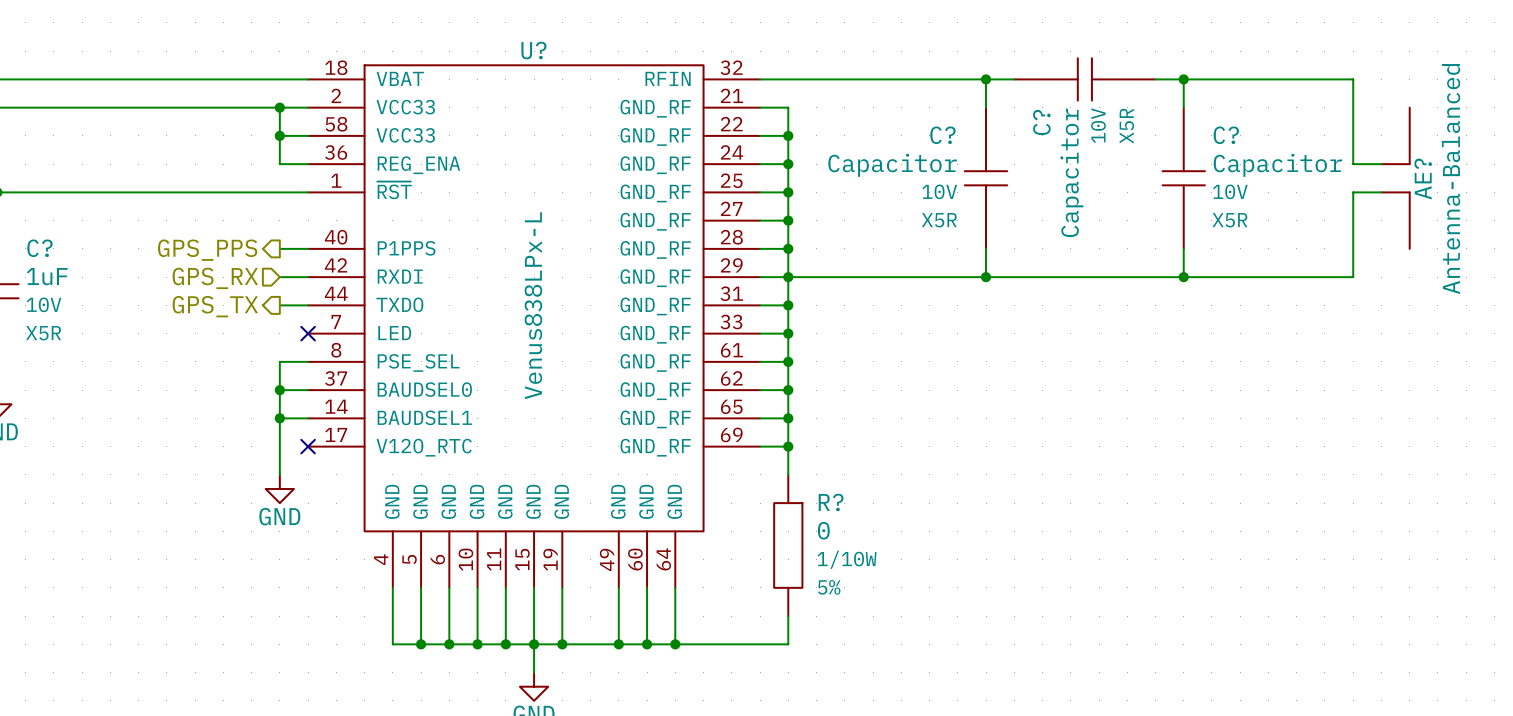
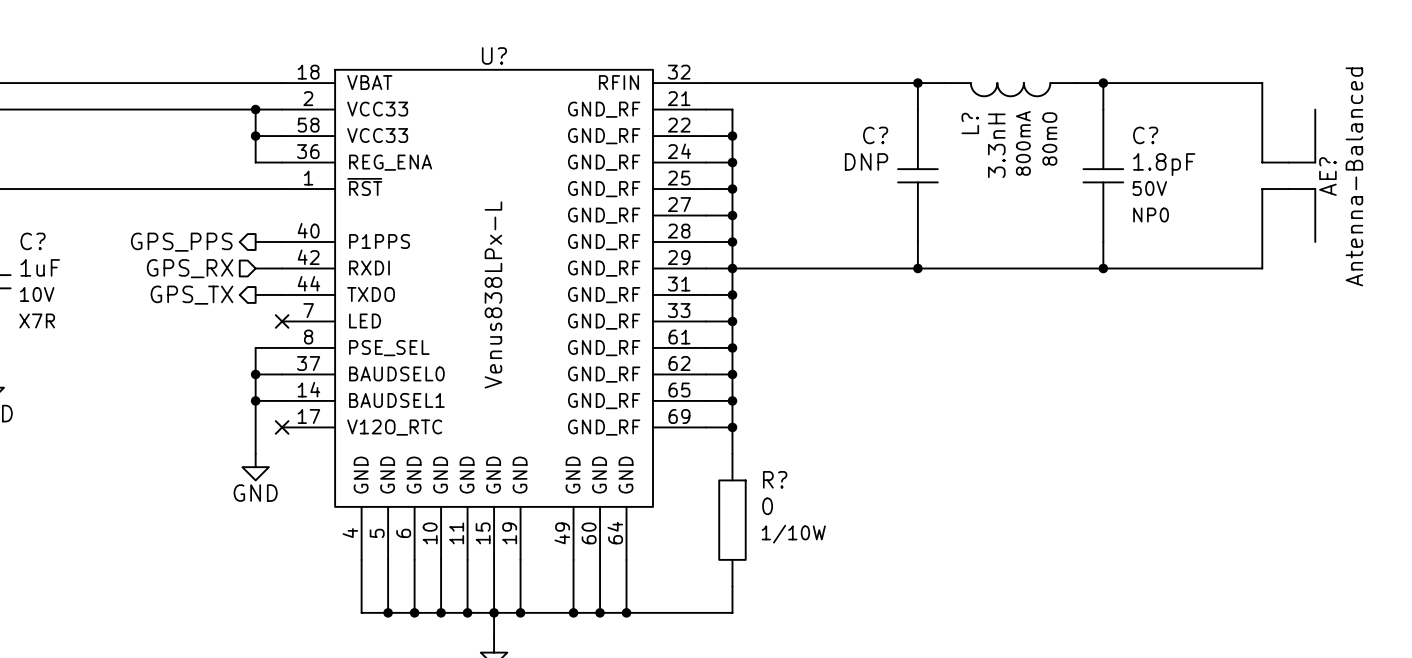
C?: Capacitor (1084, 79) -> none
L?: none -> 3.3nH (1010, 89)
C? value: Capacitor (892, 165) -> DNP (866, 161)
C? value: Capacitor (1277, 165) -> 1.8pF (1164, 164)
C? text: 10V (939, 191) -> none
C? text: 10V (1230, 191) -> 50V (1149, 188)
C? text: X5R (939, 220) -> none
C? text: X5R (1229, 220) -> NP0 (1151, 215)
C? text: X5R (43, 333) -> X7R (37, 320)
R? text: 5% (829, 587) -> none

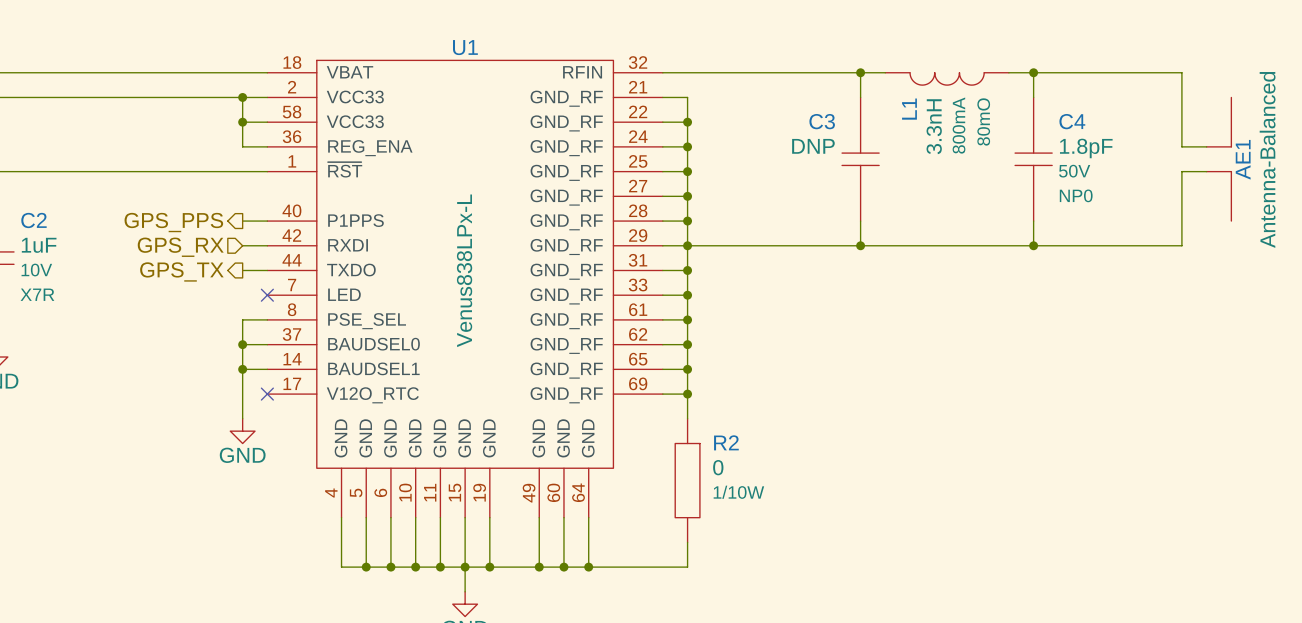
U? name: U? (494, 55) -> U1 (465, 47)
L? name: L? (970, 123) -> L1 (909, 109)
C? name: C? (875, 135) -> C3 (822, 121)
C? name: C? (1145, 135) -> C4 (1072, 121)
AE? name: AE? (1327, 176) -> AE1 (1243, 159)
C? name: C? (33, 241) -> C2 (33, 220)
R? name: R? (775, 479) -> R2 (726, 442)

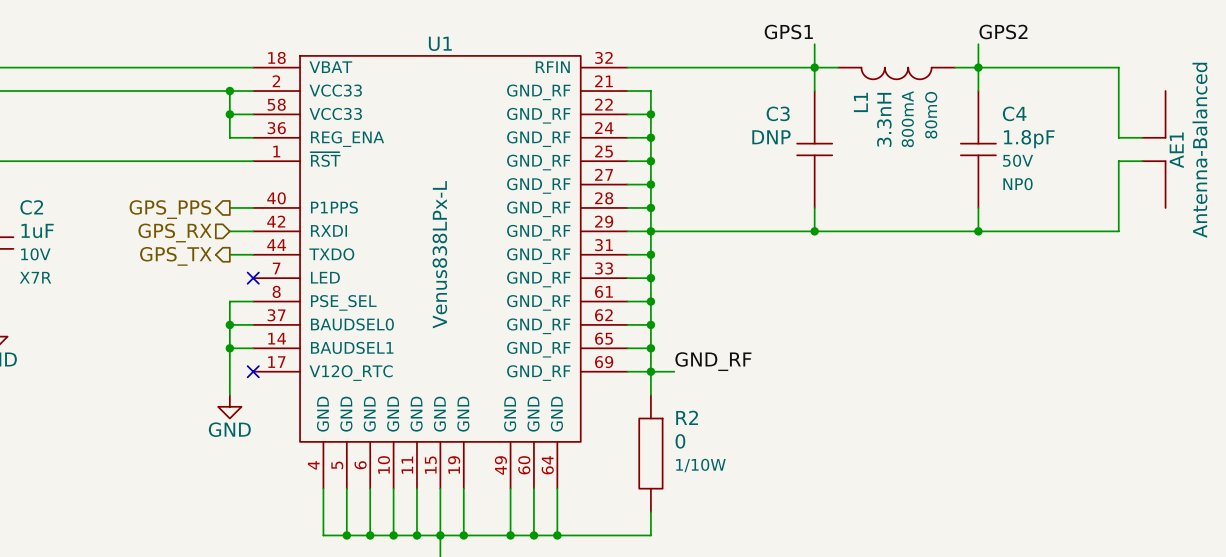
label: none -> GPS1 (788, 31)
label: none -> GPS2 (1003, 31)
wire: none -> (814, 44) (814, 67)
wire: none -> (978, 44) (978, 67)
label: none -> GND_RF (713, 361)
wire: none -> (650, 371) (674, 371)

